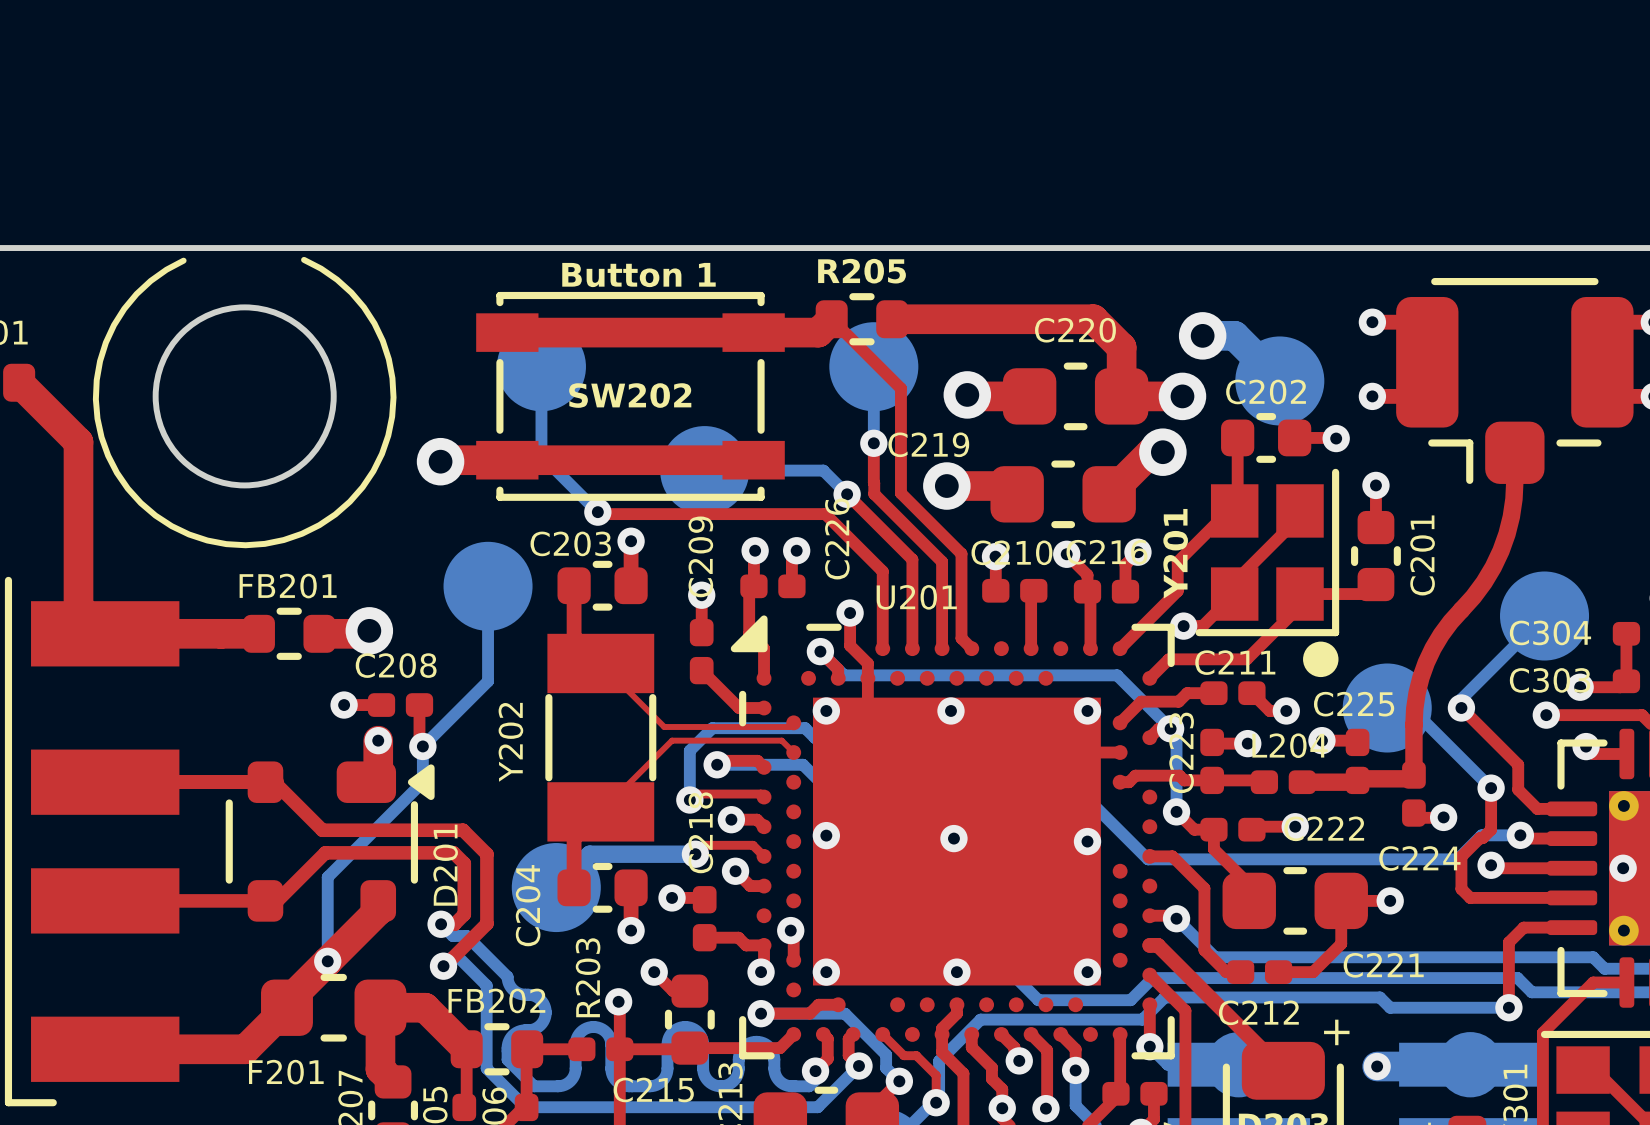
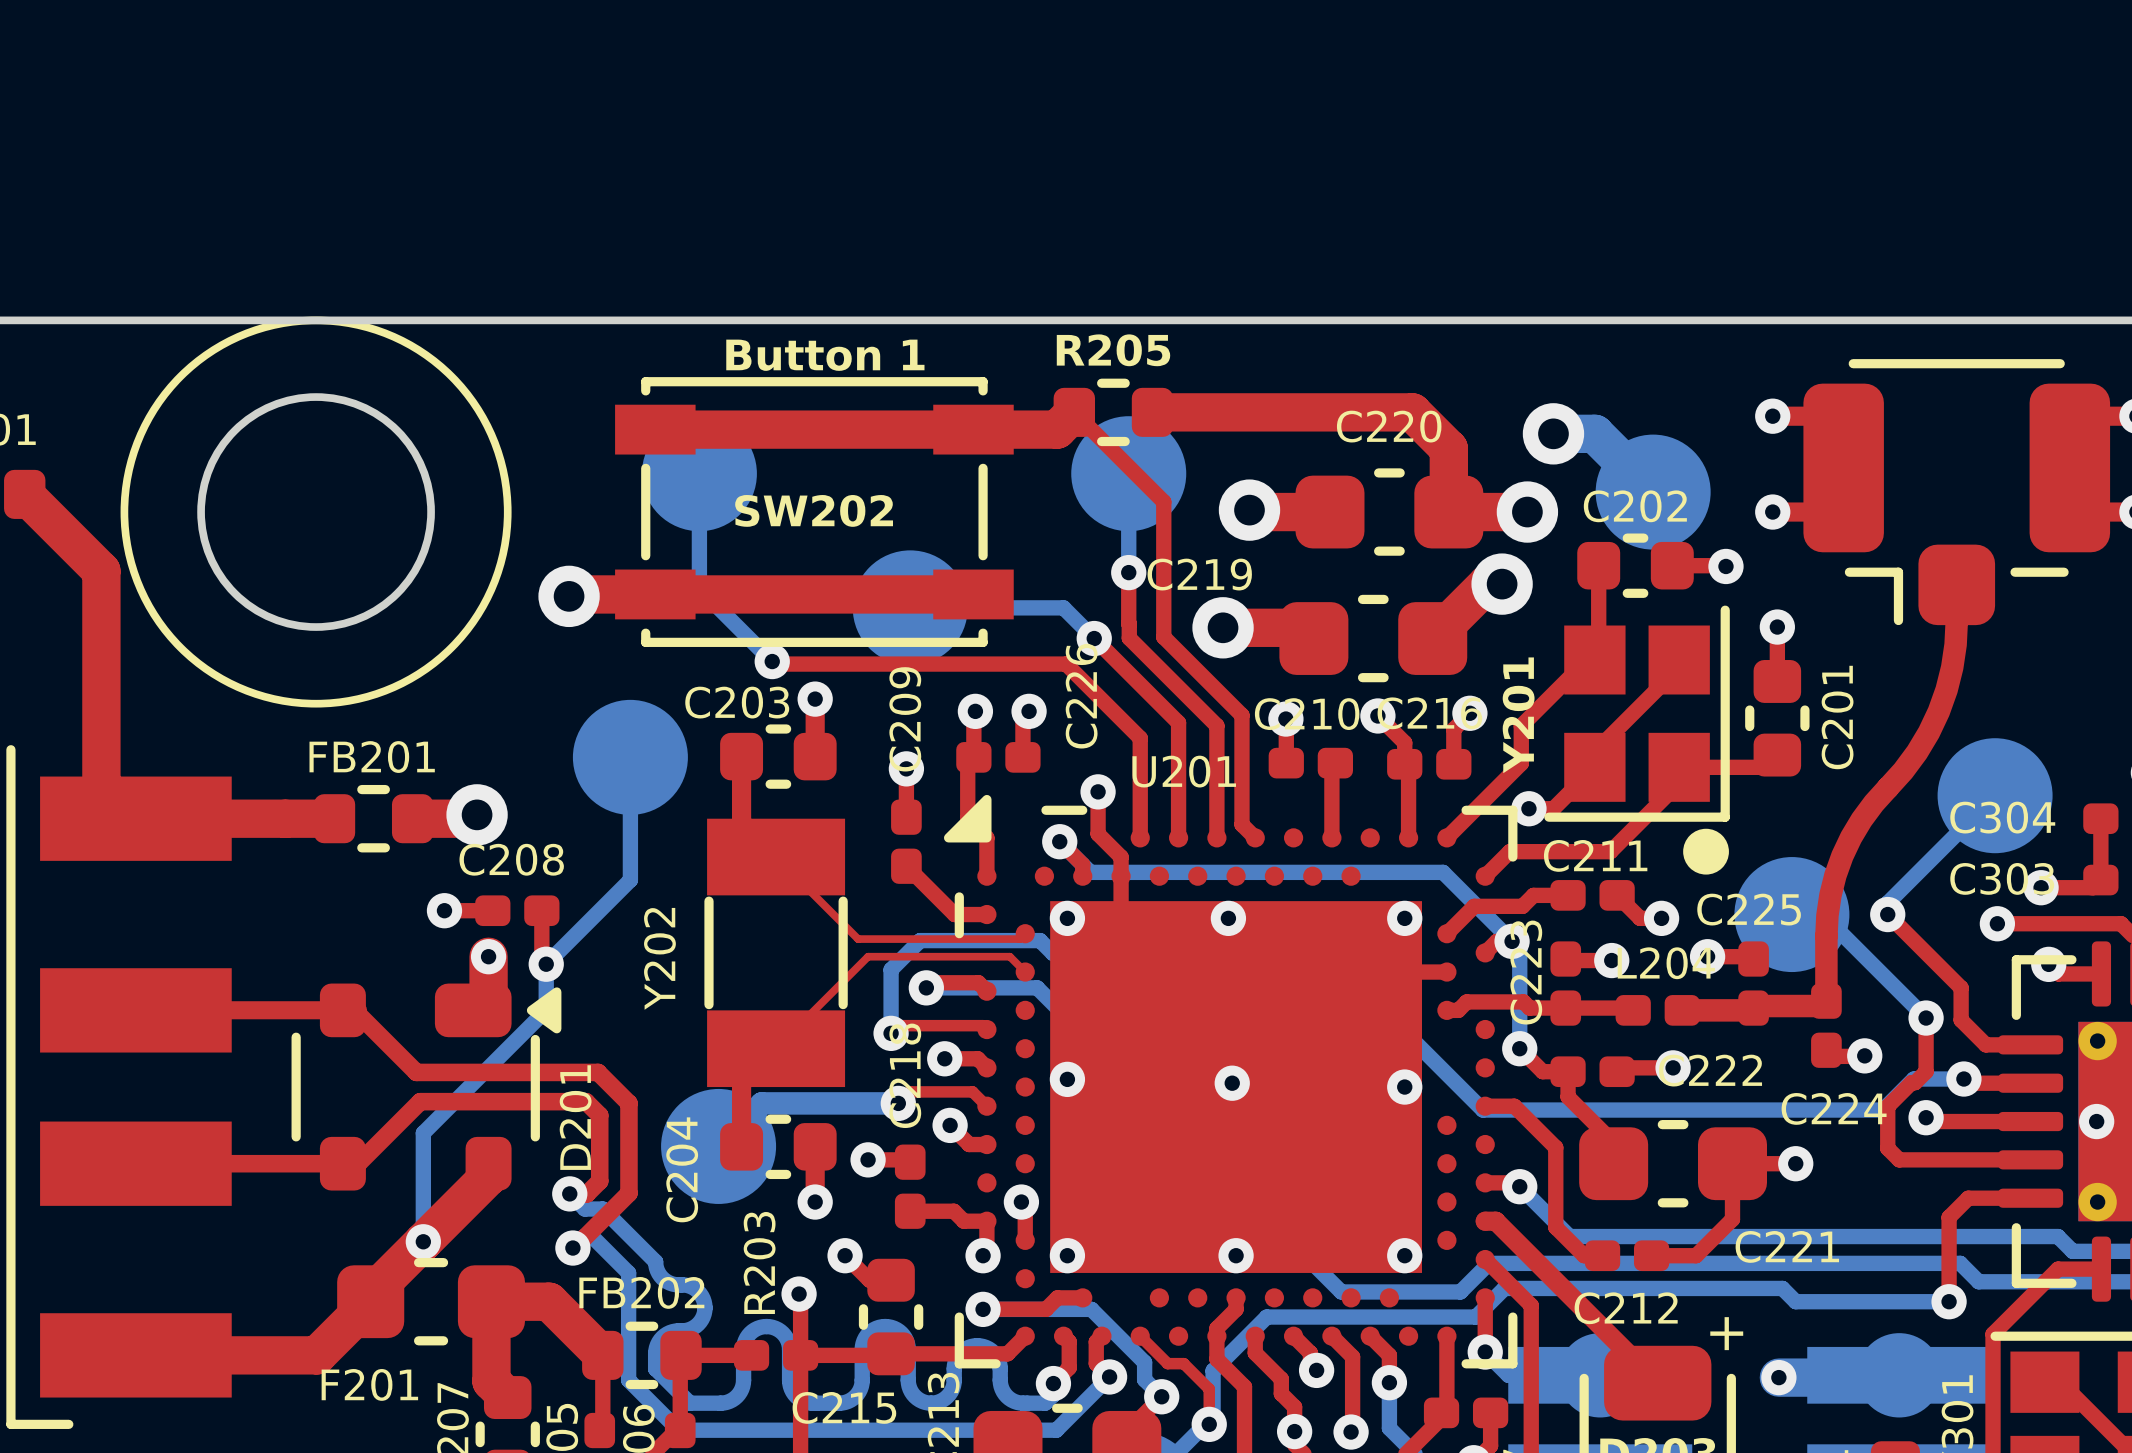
drawing: none -> [120, 316, 512, 708]
line: (304, 259) (321, 268) (351, 292) (374, 323) (388, 359) (392, 378) (392, 416) (388, 435) (373, 471) (349, 501) (335, 514) (302, 533) (264, 543) (245, 545) (207, 540) (189, 534) (155, 515) (140, 503) (116, 472) (101, 437) (95, 399) (96, 380) (100, 361) (113, 325) (136, 294) (150, 280) (183, 260) -> none

